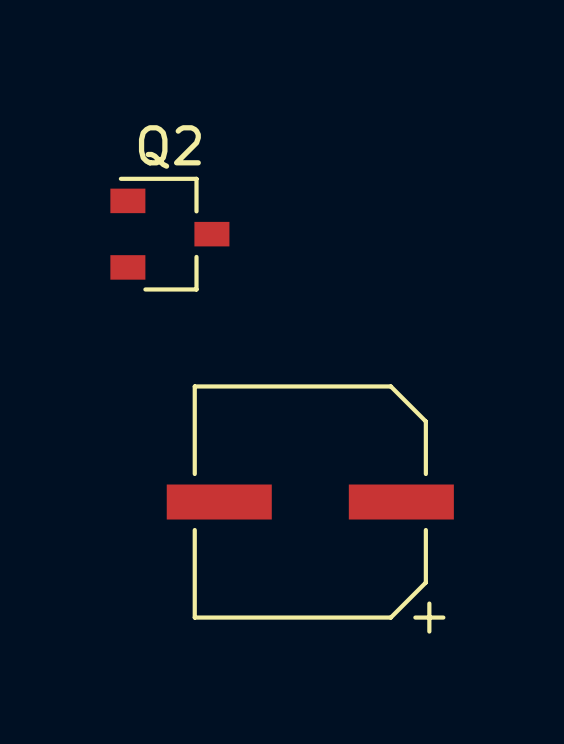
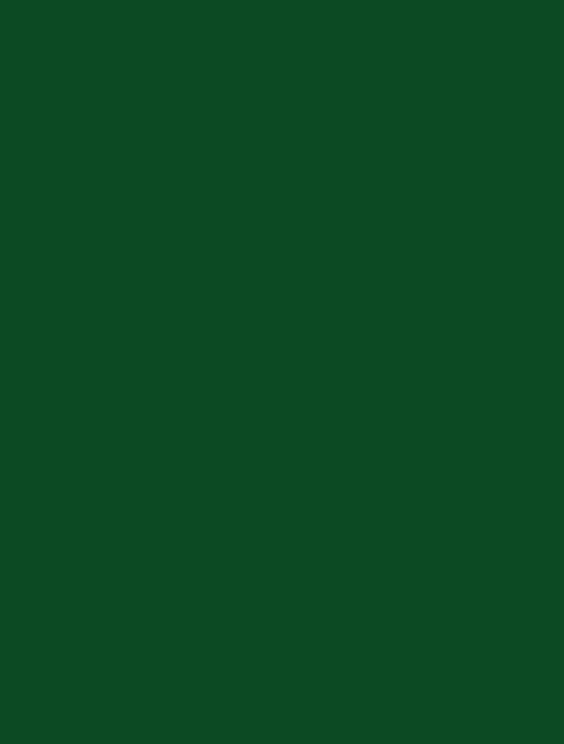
Q2: (169, 234) -> none
part: (310, 509) -> none

